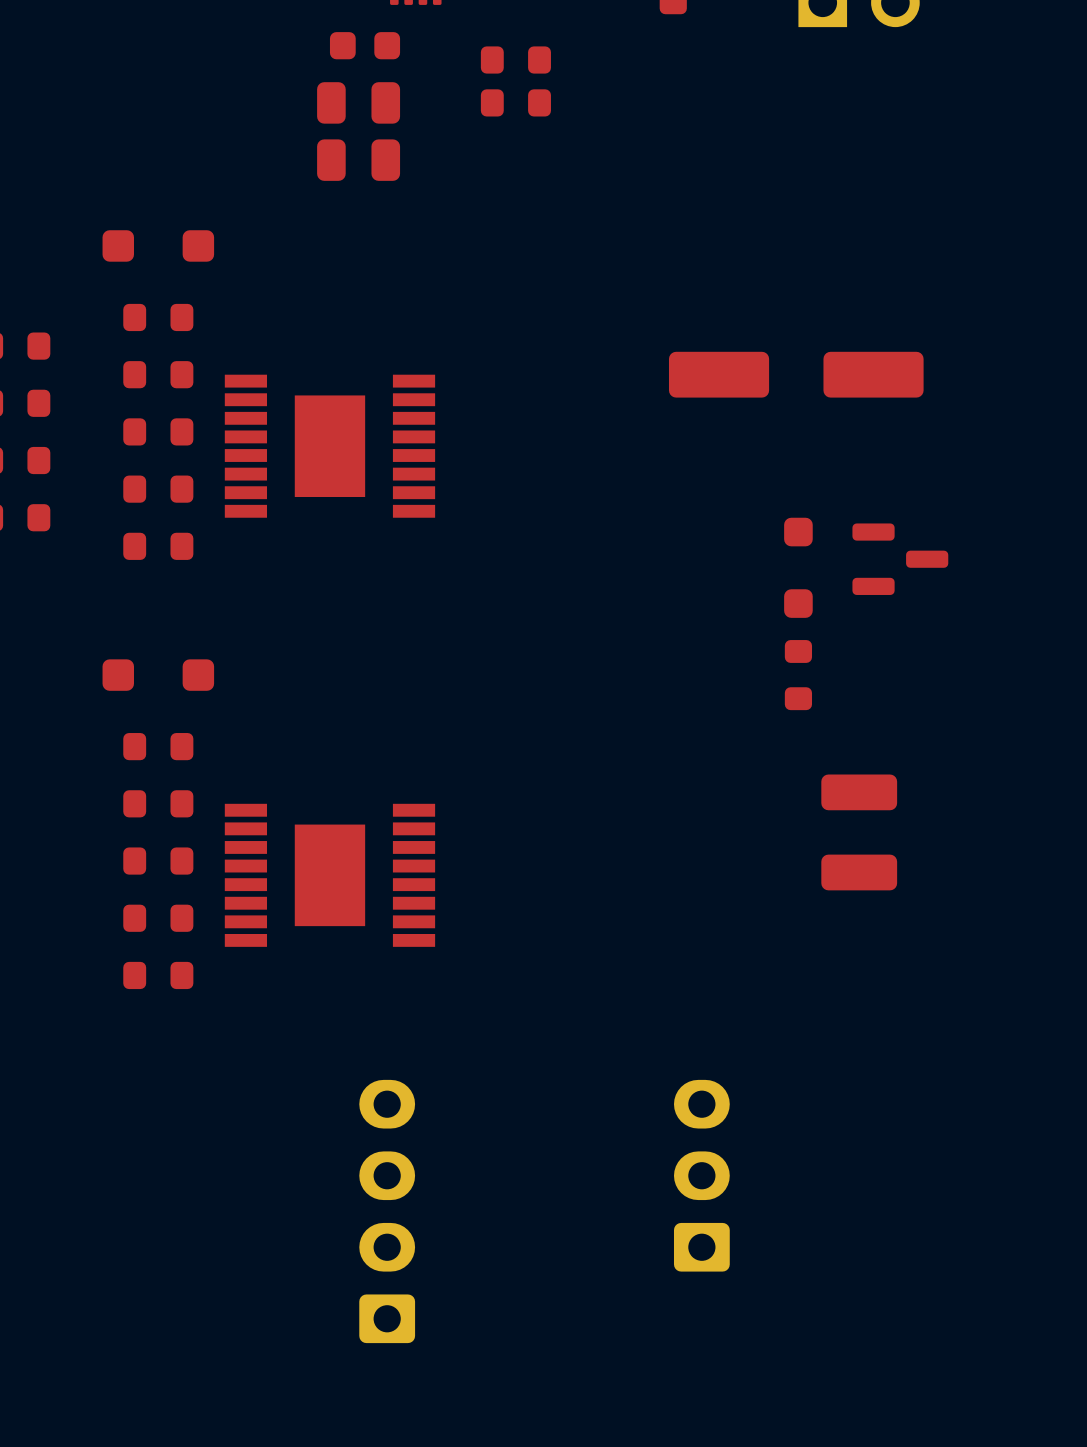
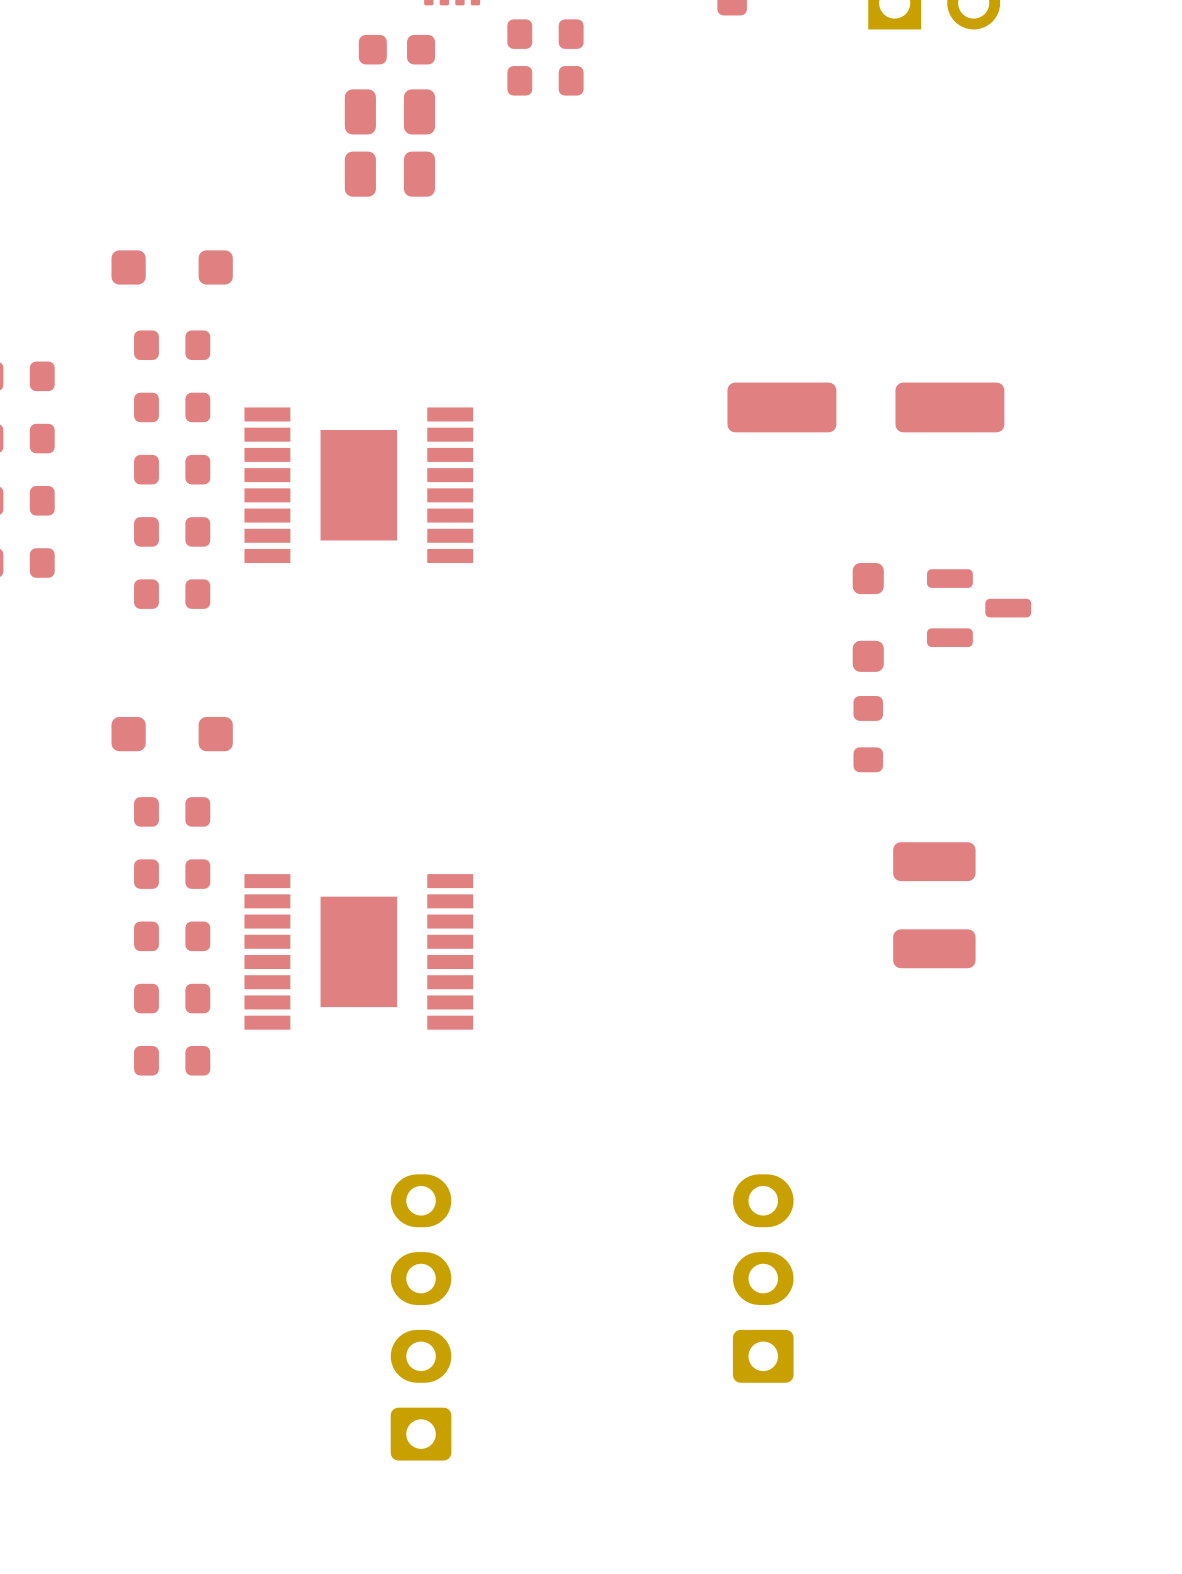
part: none -> (545, 34)
part: (515, 60) -> none
part: none -> (545, 80)
part: (515, 102) -> none

